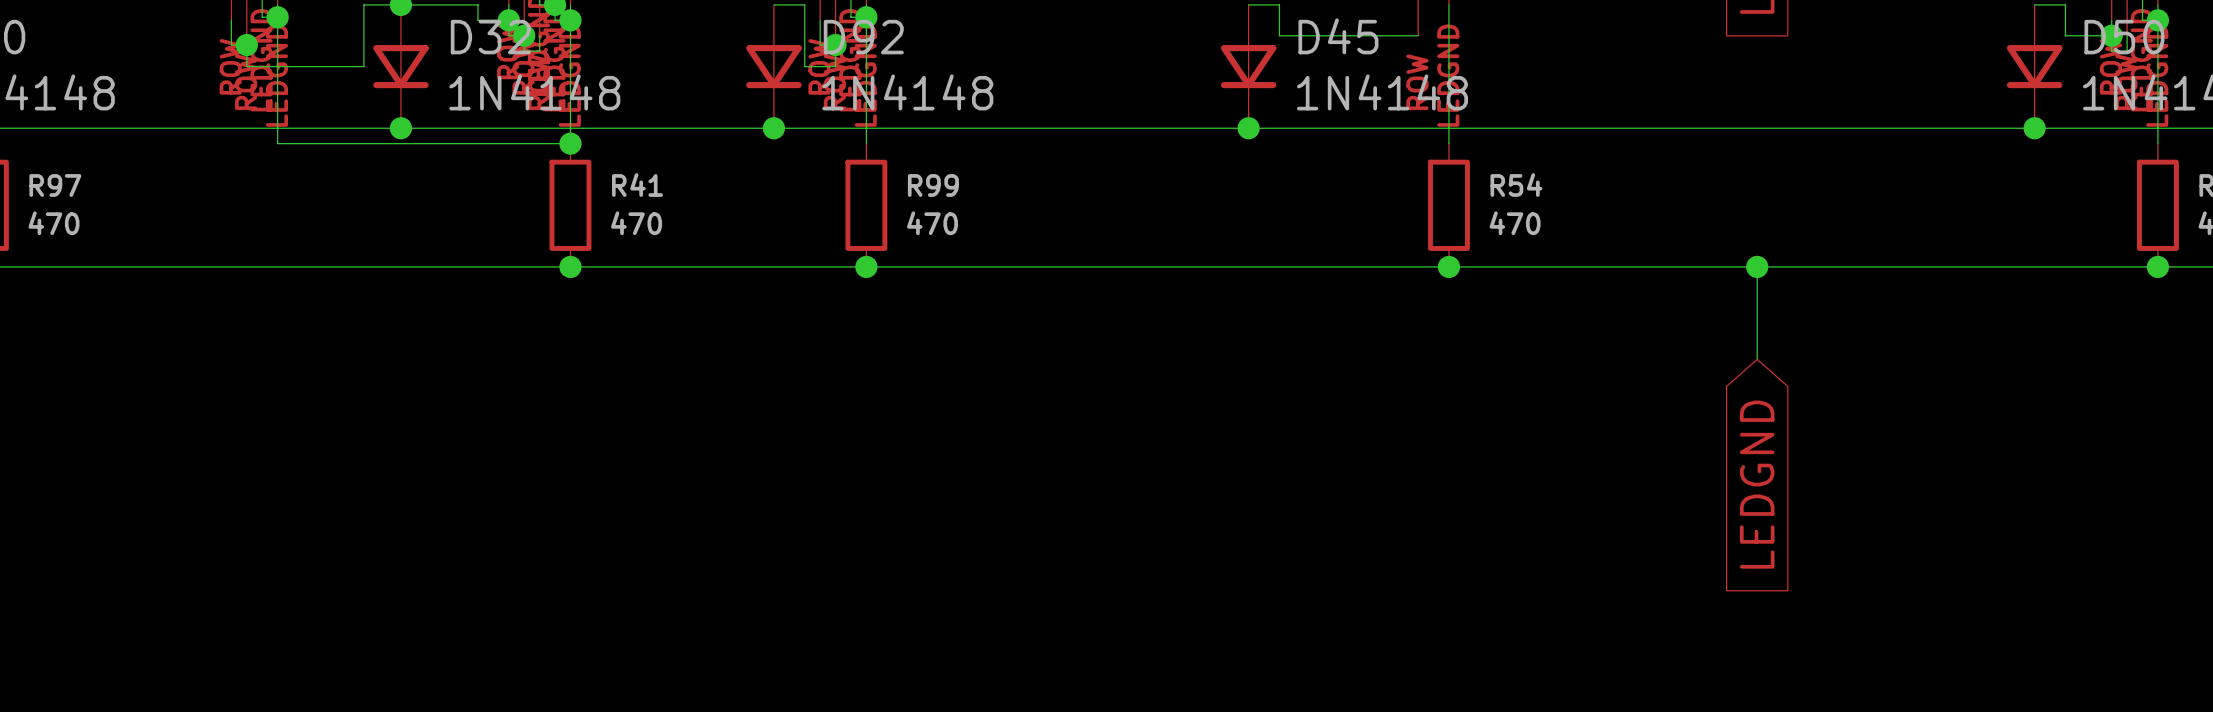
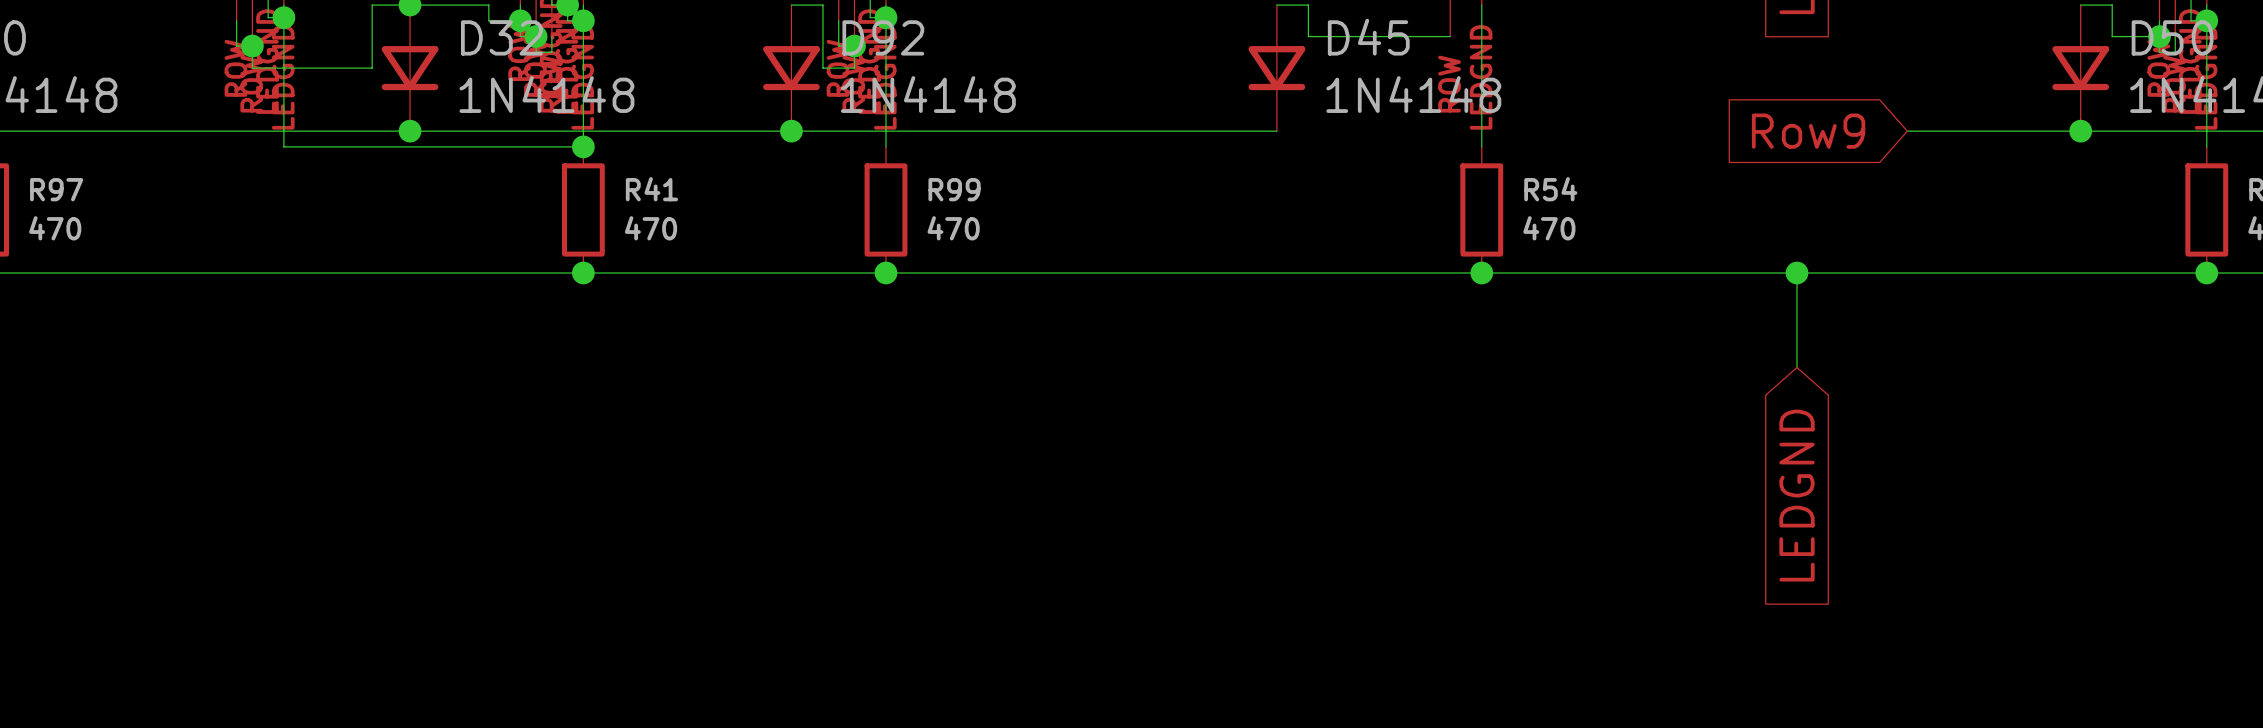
wire: (1248, 128) (1865, 128) -> none
junction: (1248, 128) -> none
global label: none -> Row9 (1808, 131)

